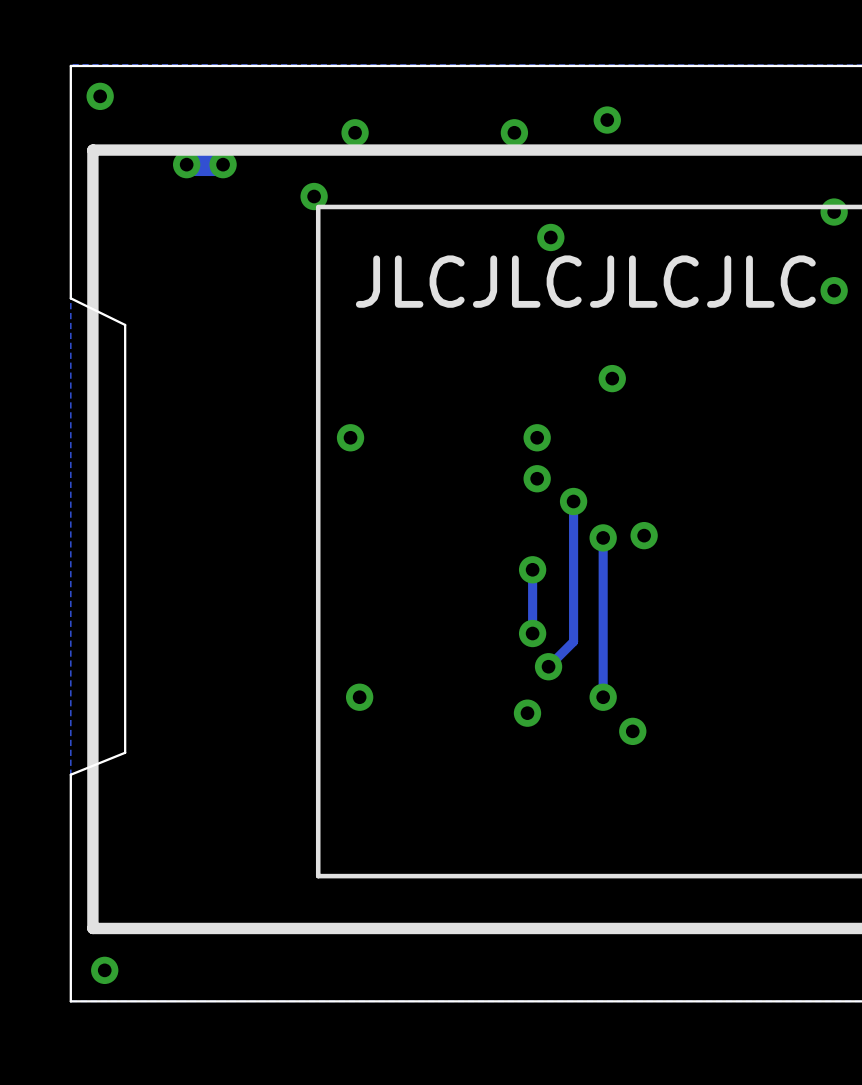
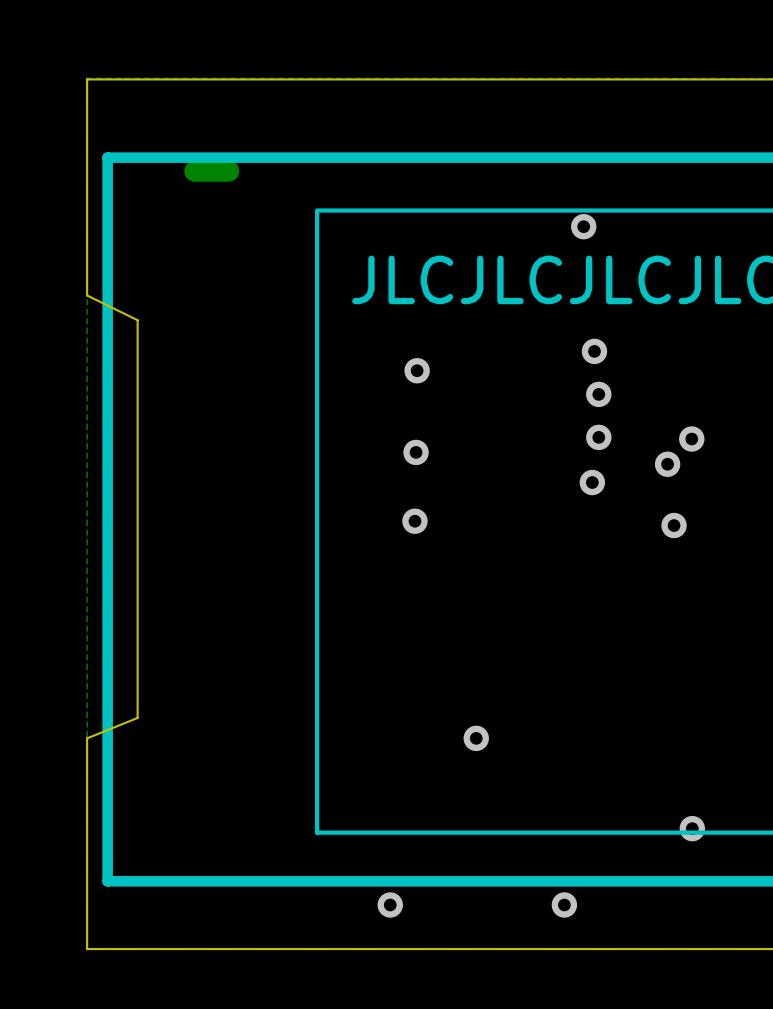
via: (100, 96) -> none
via: (607, 120) -> none
via: (355, 132) -> none
via: (514, 132) -> none
via: (186, 164) -> none
via: (223, 164) -> none
via: (314, 196) -> none
via: none -> (583, 226)
via: (550, 237) -> none
via: none -> (594, 351)
via: (612, 378) -> none
via: none -> (417, 370)
via: none -> (598, 394)
via: (350, 437) -> none
via: (537, 437) -> none
via: none -> (598, 437)
via: none -> (691, 439)
via: none -> (416, 452)
via: (537, 478) -> none
via: none -> (667, 464)
via: none -> (592, 482)
track: (573, 501) (573, 641) (548, 666) -> none
via: (573, 501) -> none
via: (644, 535) -> none
track: (603, 537) (603, 697) -> none
via: (603, 537) -> none
via: none -> (414, 521)
via: none -> (674, 525)
track: (532, 569) (532, 633) -> none
via: (532, 569) -> none
via: (532, 633) -> none
via: (548, 666) -> none
via: (359, 697) -> none
via: (603, 697) -> none
via: (527, 713) -> none
via: (632, 731) -> none
via: none -> (476, 738)
via: none -> (692, 828)
via: none -> (390, 904)
via: none -> (564, 904)
via: (104, 970) -> none

